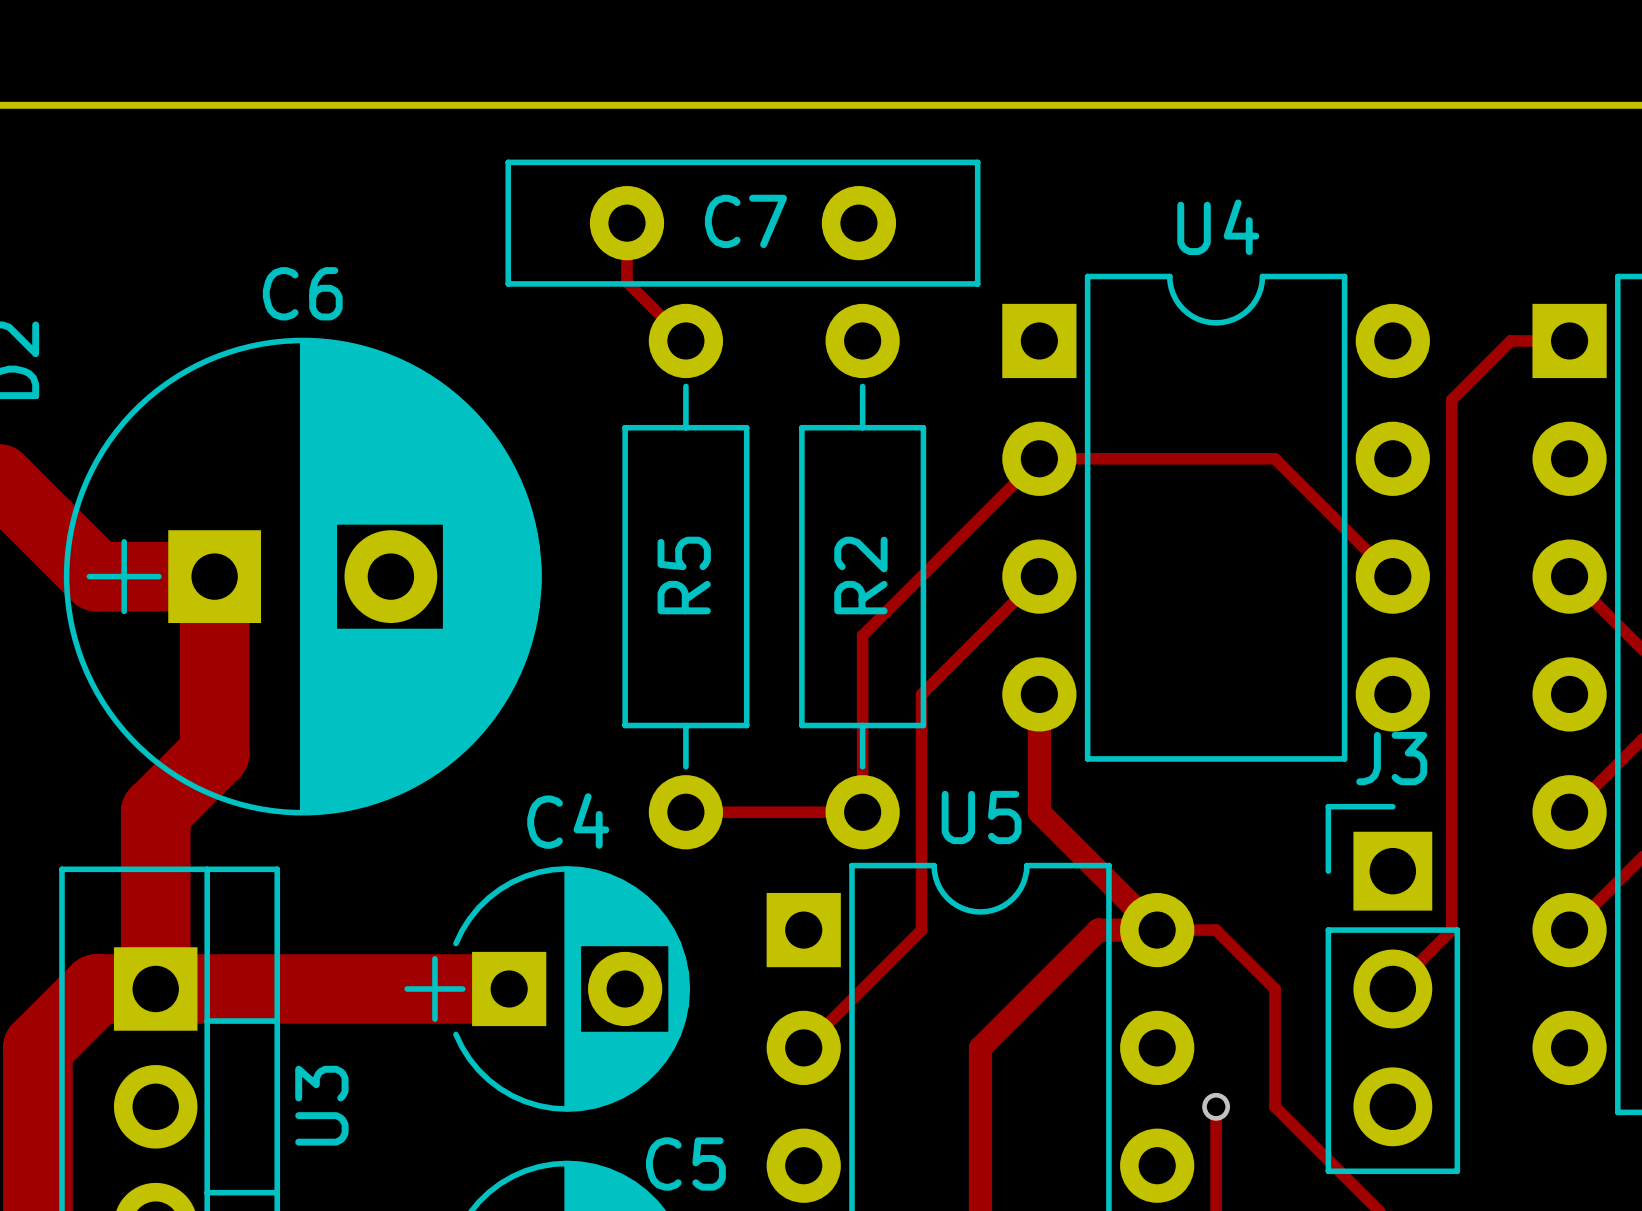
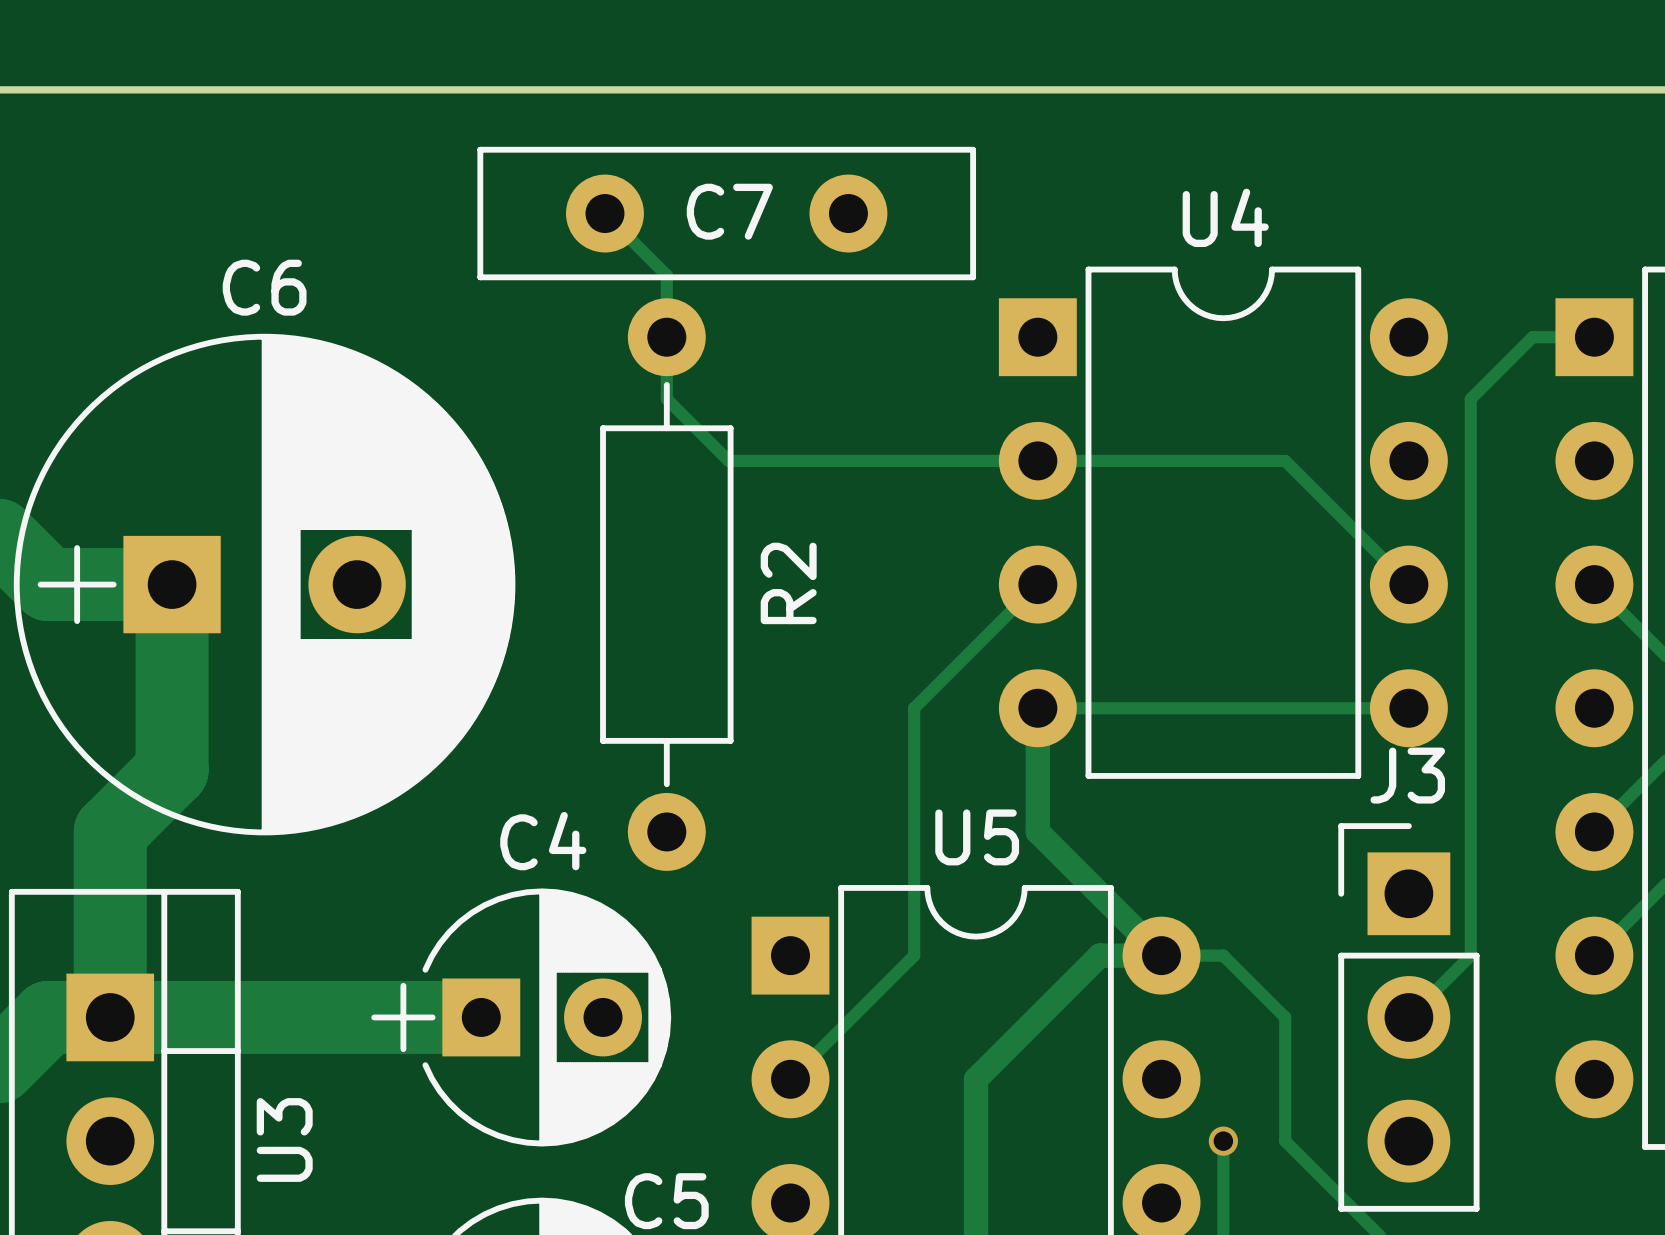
track: (627, 223) (627, 282) (685, 340) -> (604, 213) (666, 275) (666, 399) (728, 460) (1037, 460)
track: (1039, 458) (862, 635) (862, 812) (685, 812) -> none
R2 name position: R2 (860, 575) -> R2 (788, 583)
R5: (862, 576) -> none
track: none -> (1037, 708) (1408, 708)

